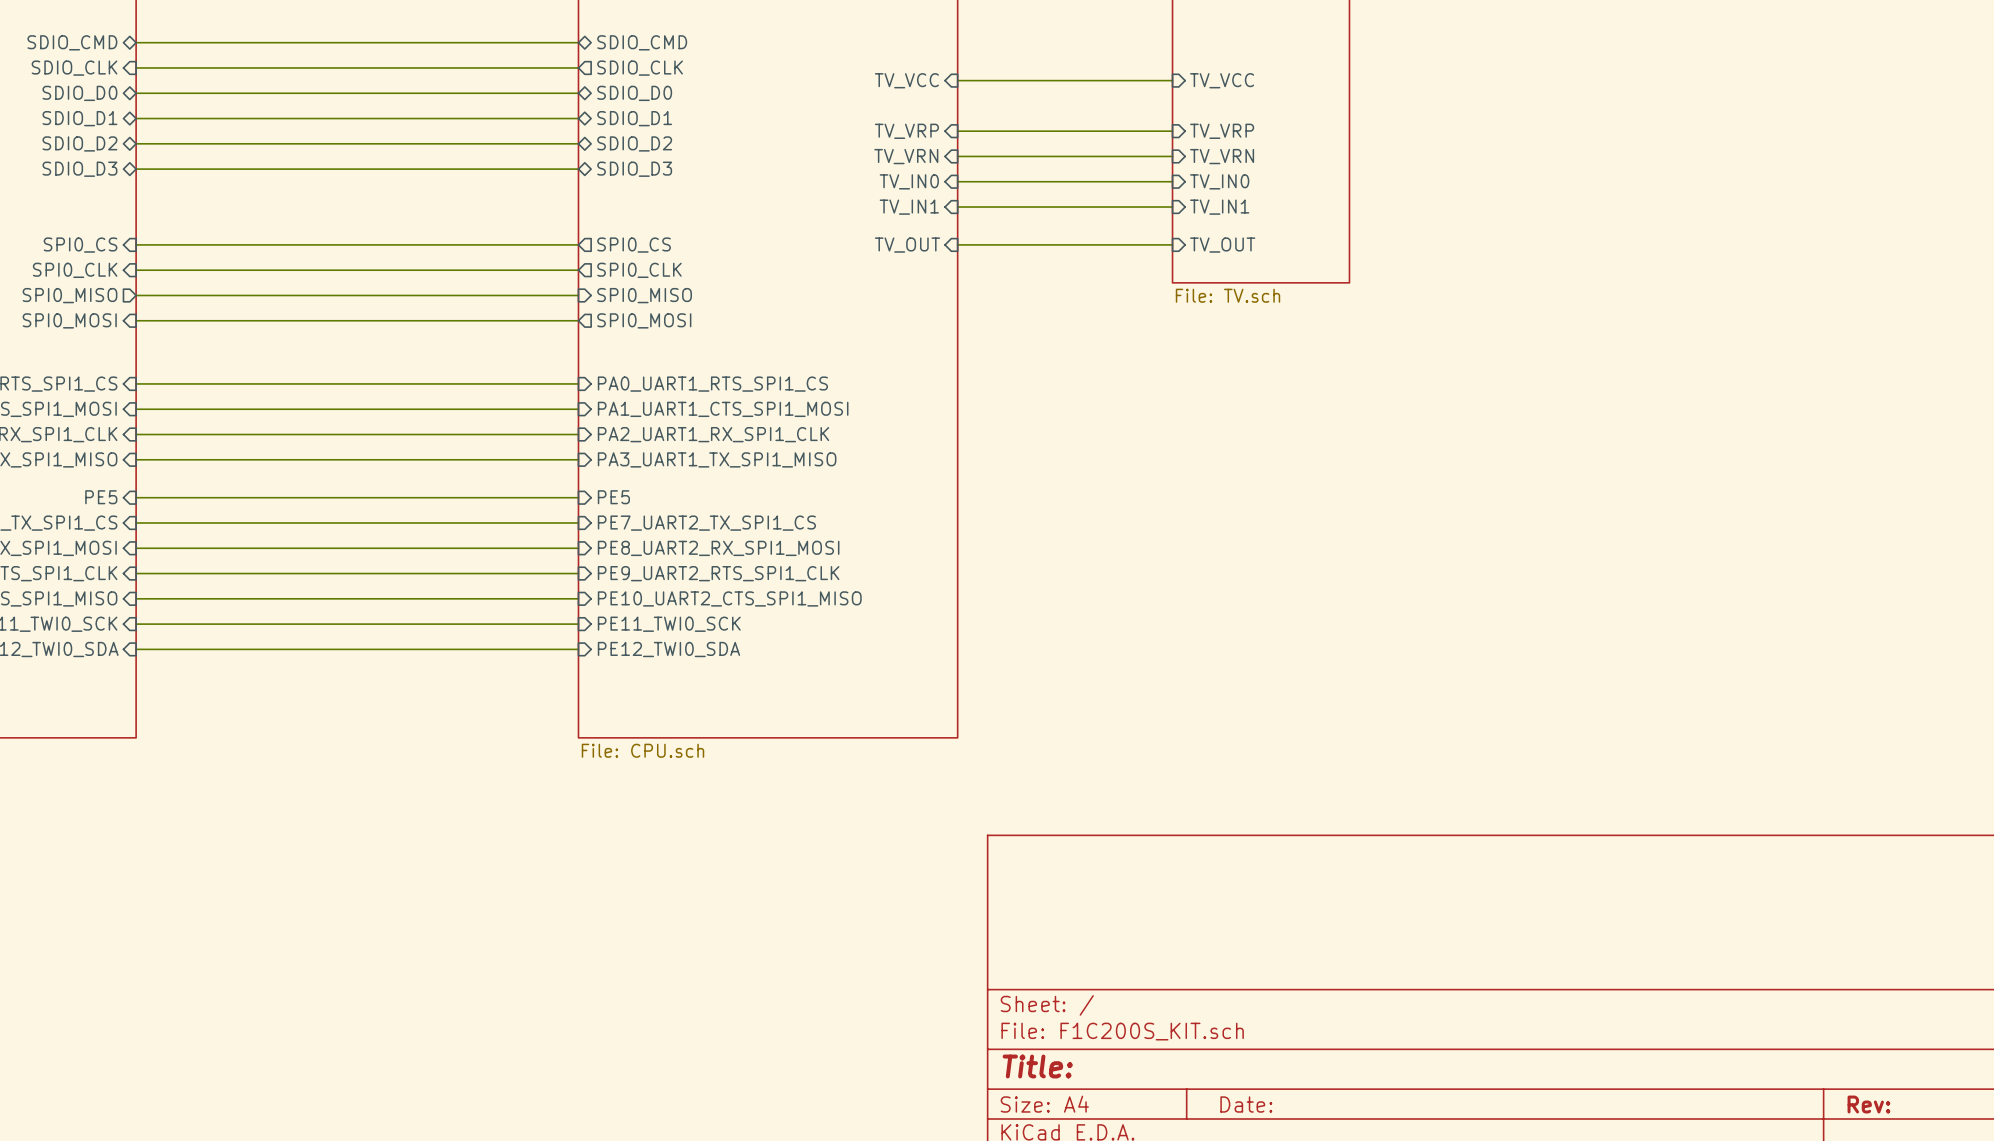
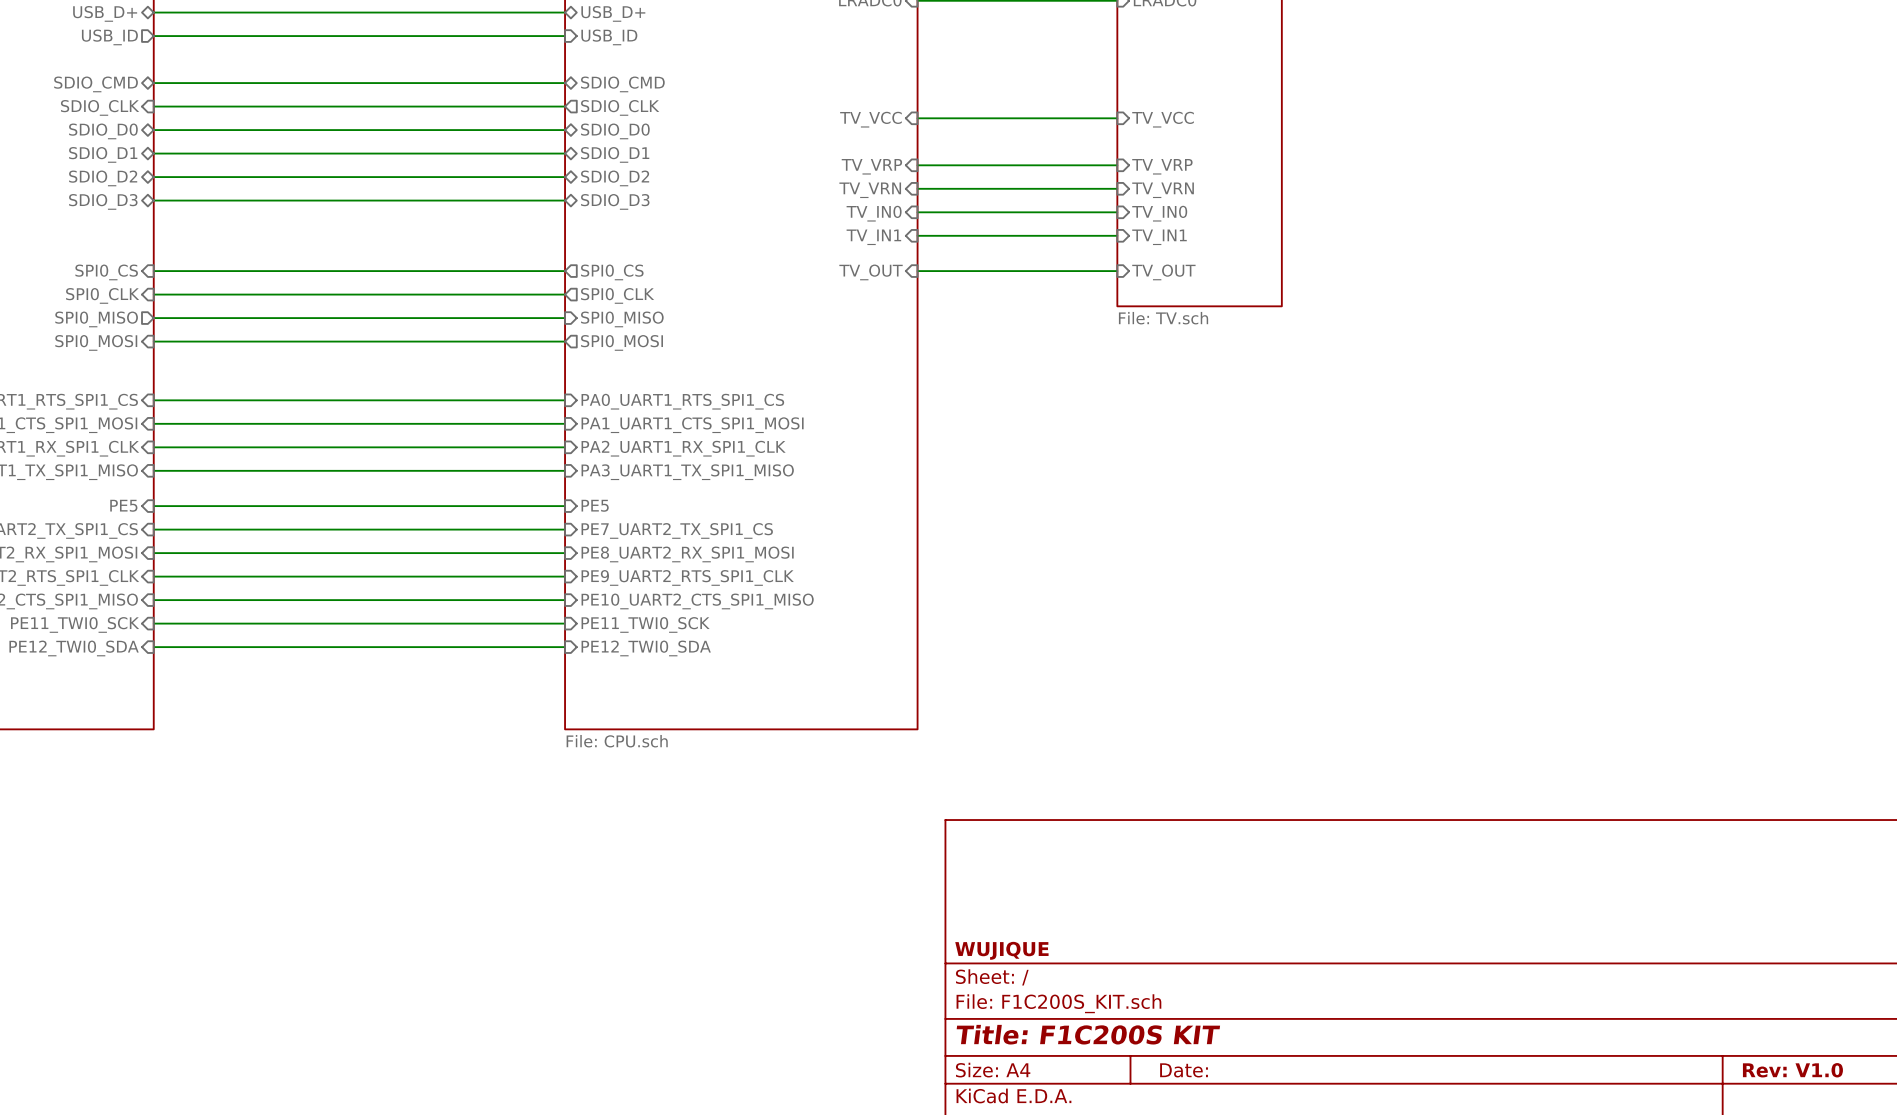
title block: none -> WUJIQUE (1001, 950)
title block: Title: (1037, 1066) -> Title: F1C200S KIT (1088, 1034)
title block: Rev: (1868, 1104) -> Rev: V1.0 (1792, 1070)

